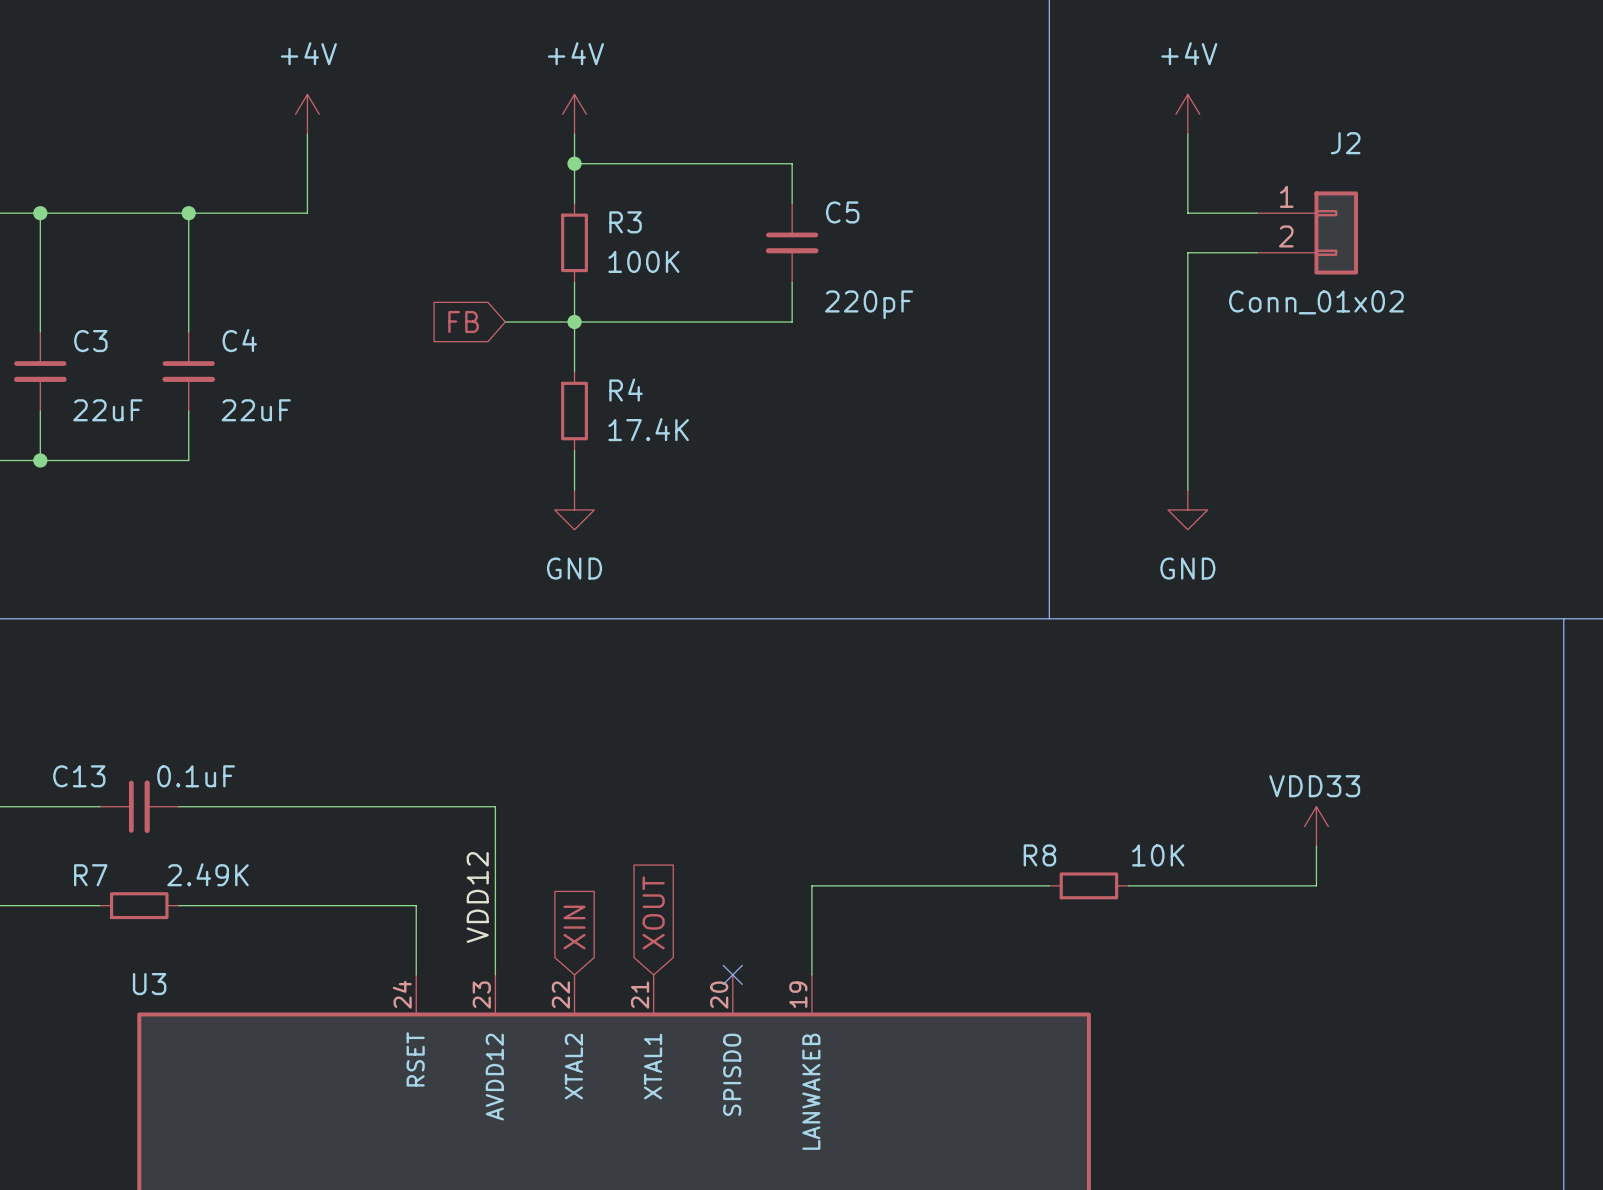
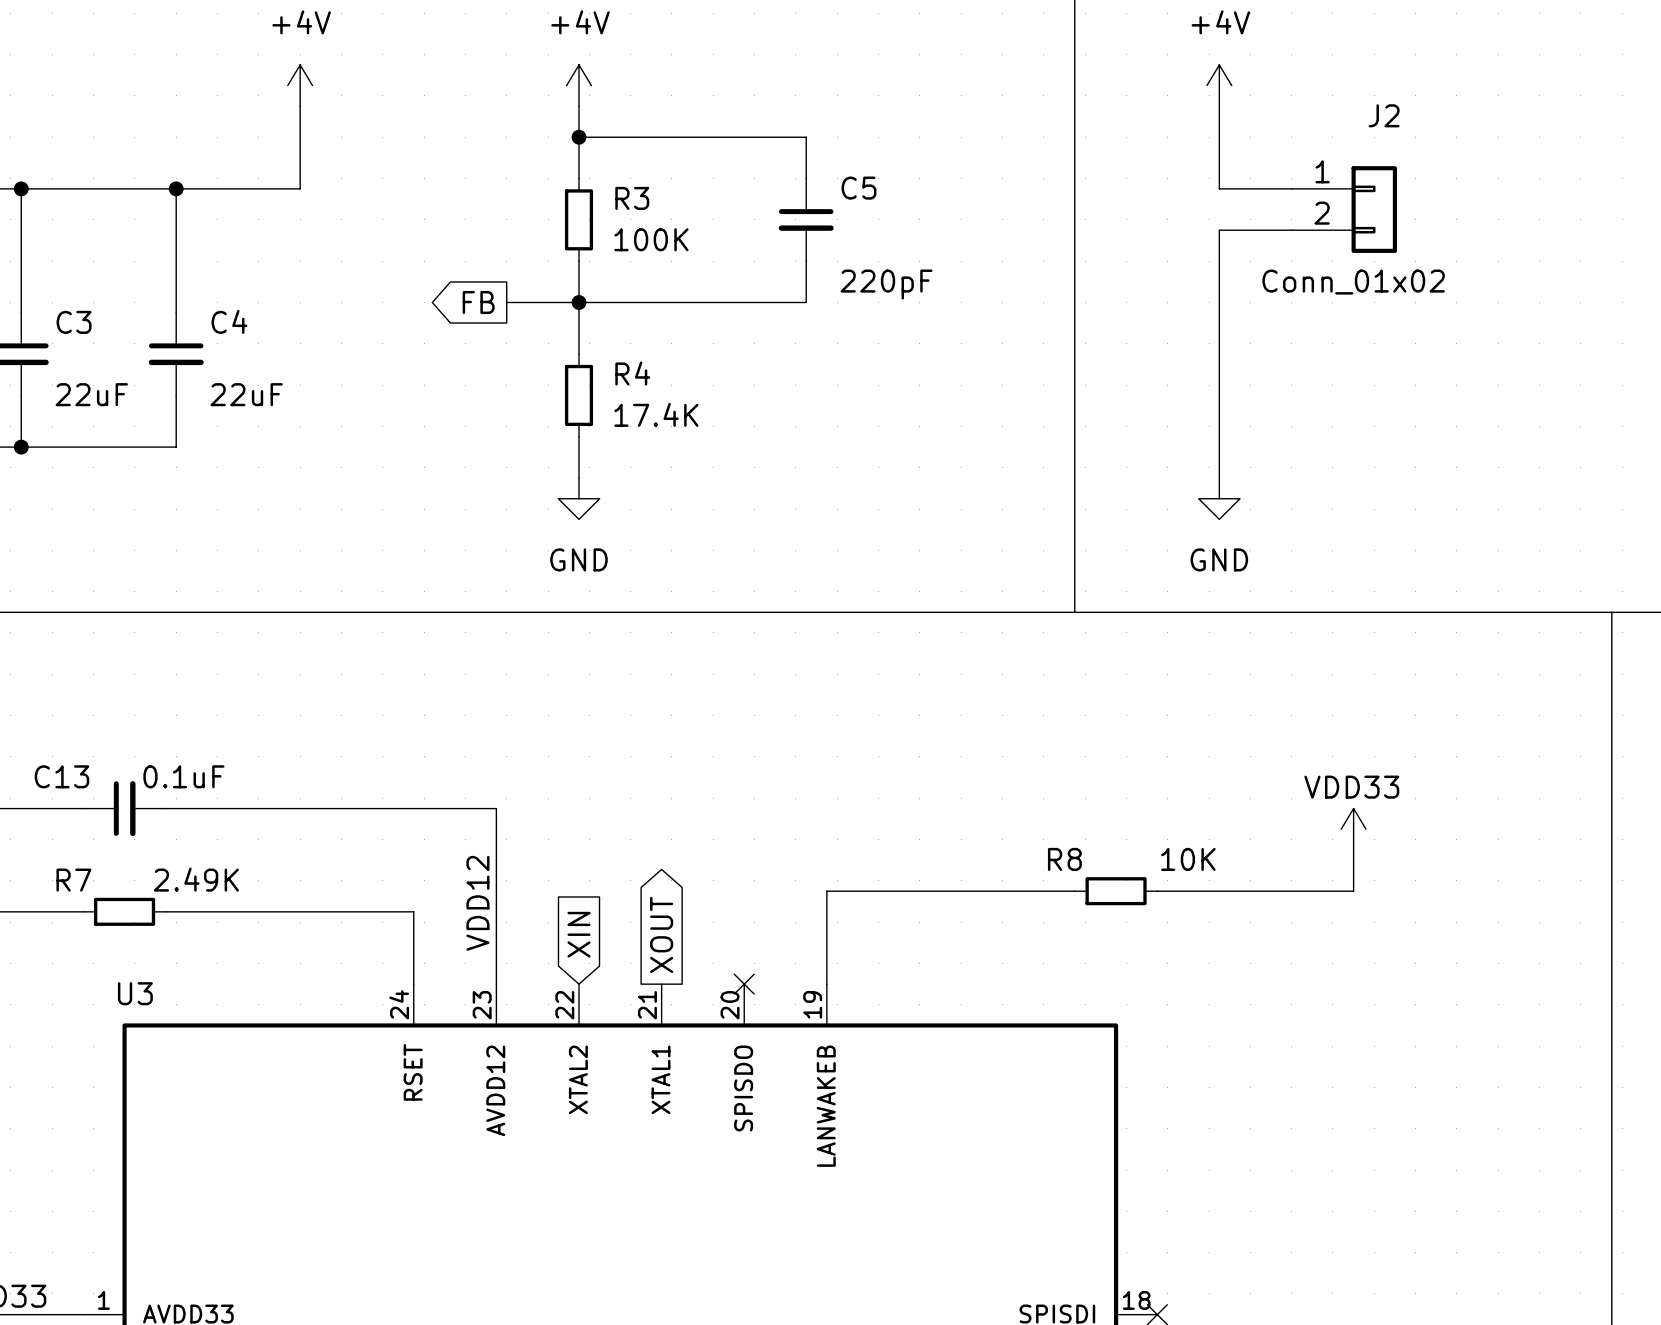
global label shape: input (463, 322) -> output (478, 302)
global label shape: input (653, 912) -> output (661, 934)

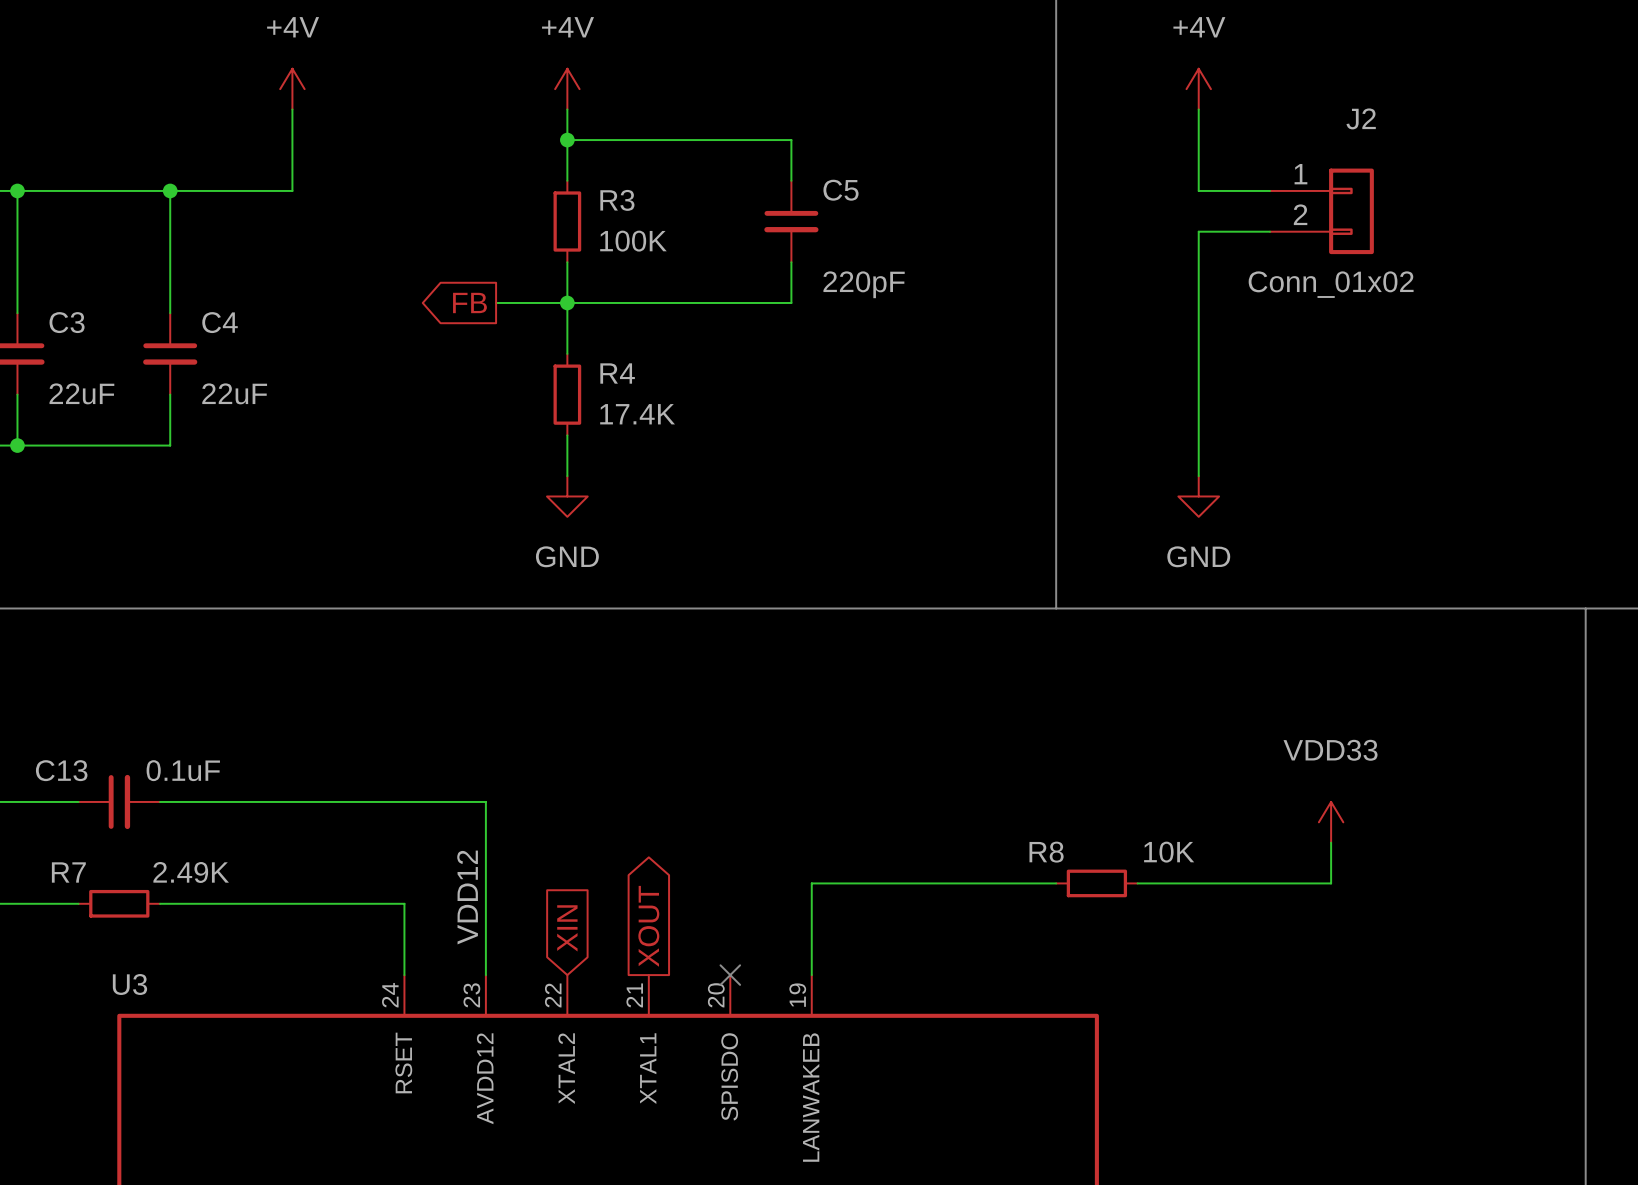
power symbol text position: VDD33 (1351, 787) -> VDD33 (1330, 750)

